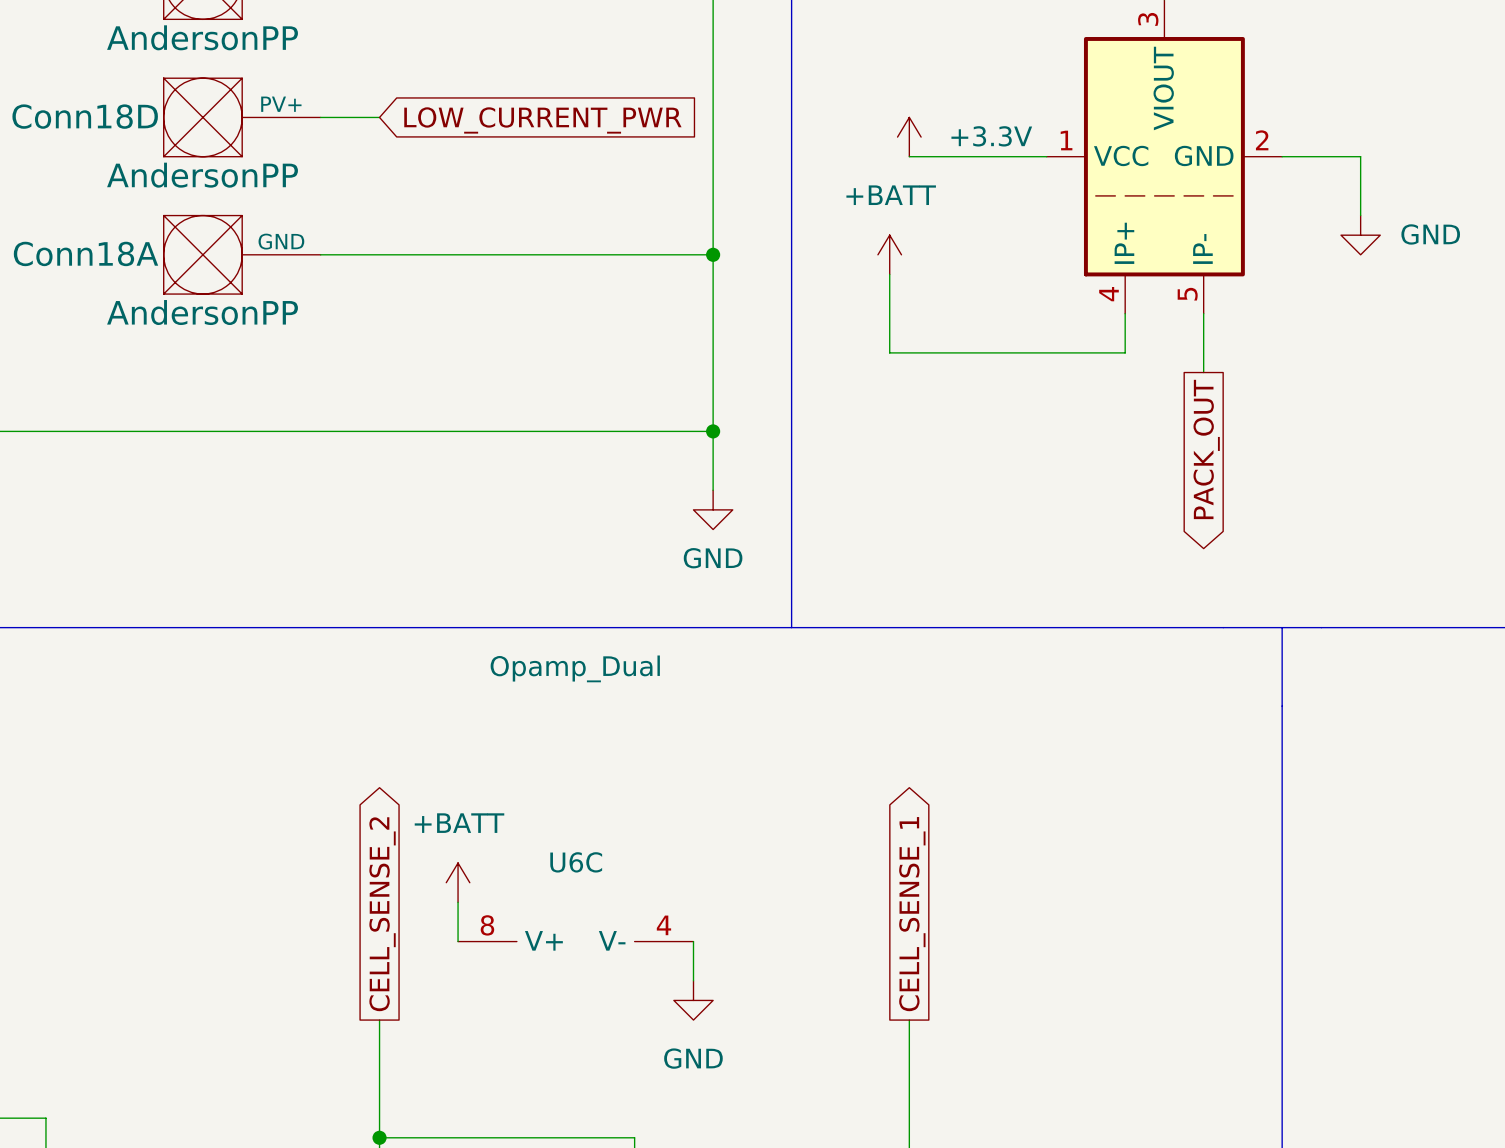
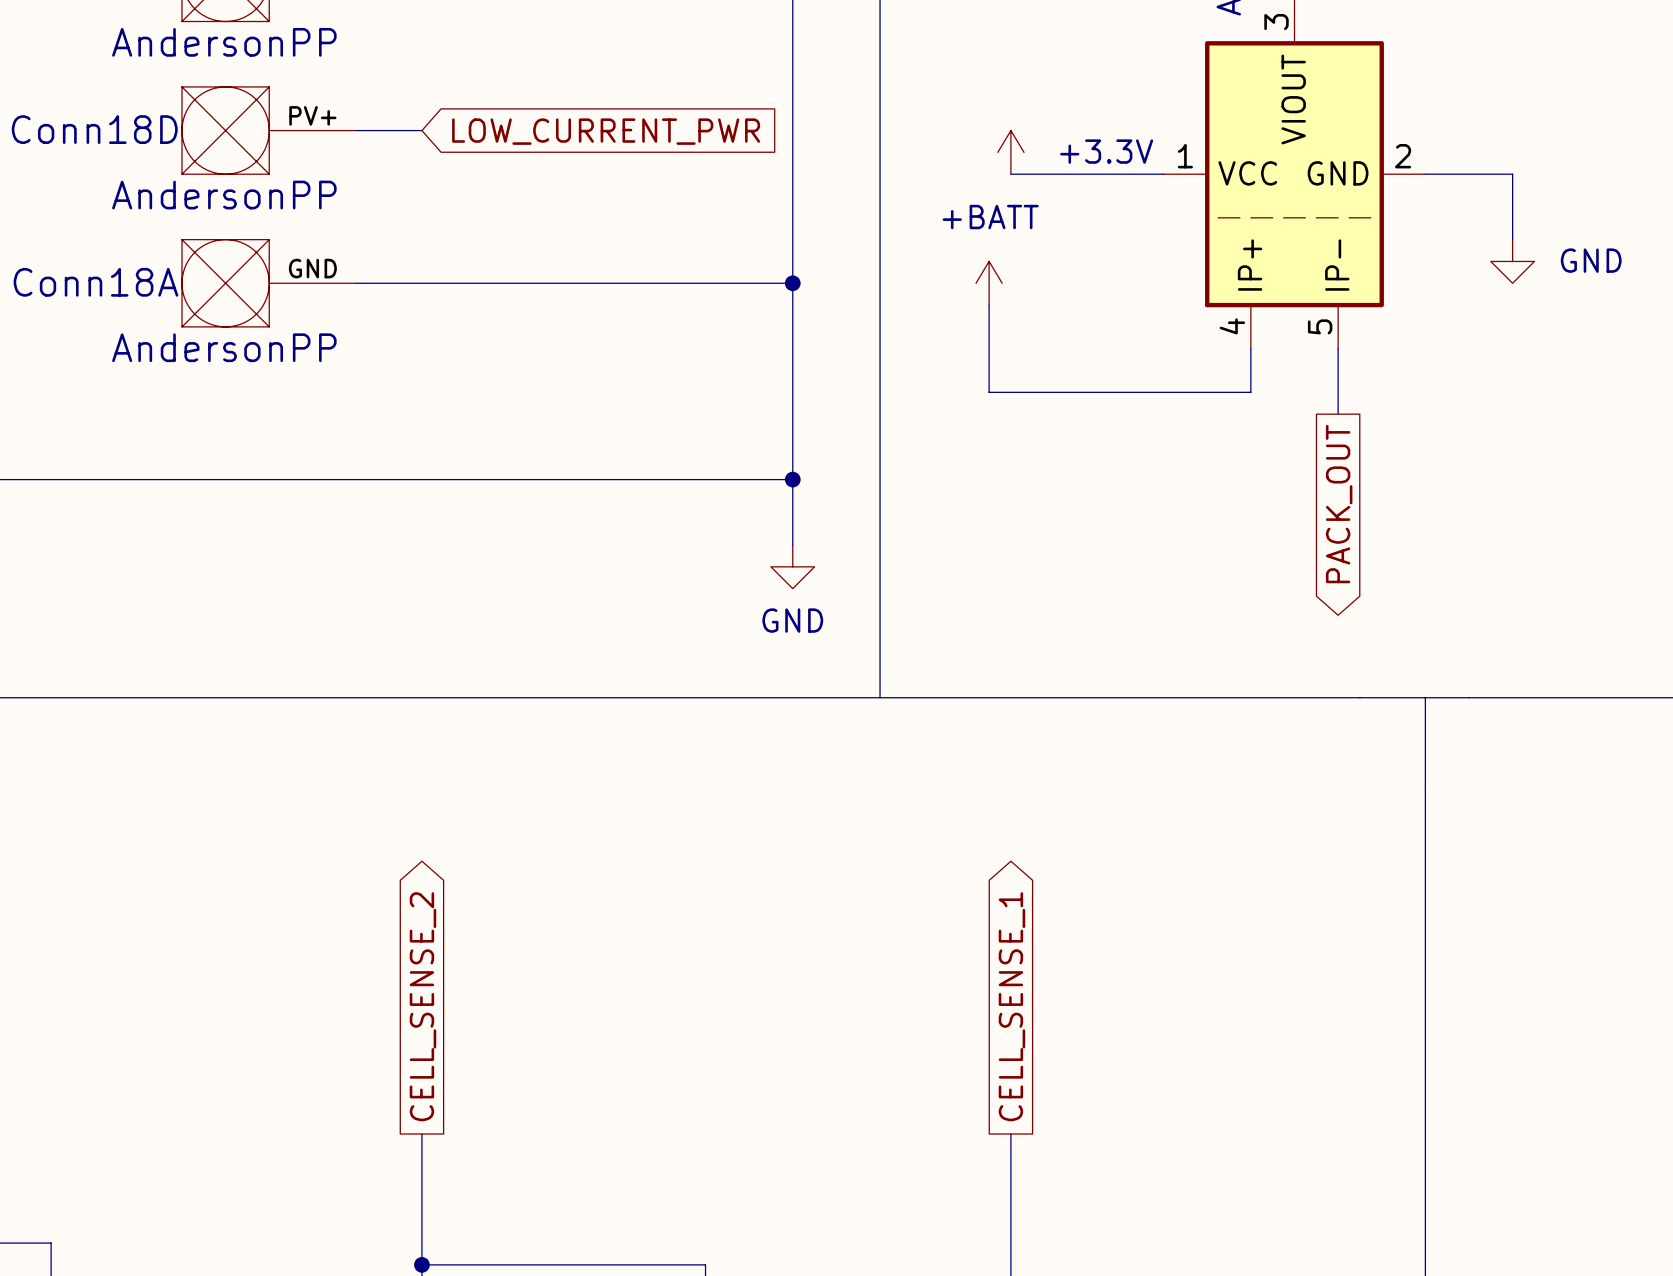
power symbol: +BATT (458, 882) -> none
wire: (458, 902) (458, 941) -> none
U6C: Opamp_Dual (575, 941) -> none
wire: (693, 941) (693, 980) -> none
power symbol: GND (693, 1000) -> none

